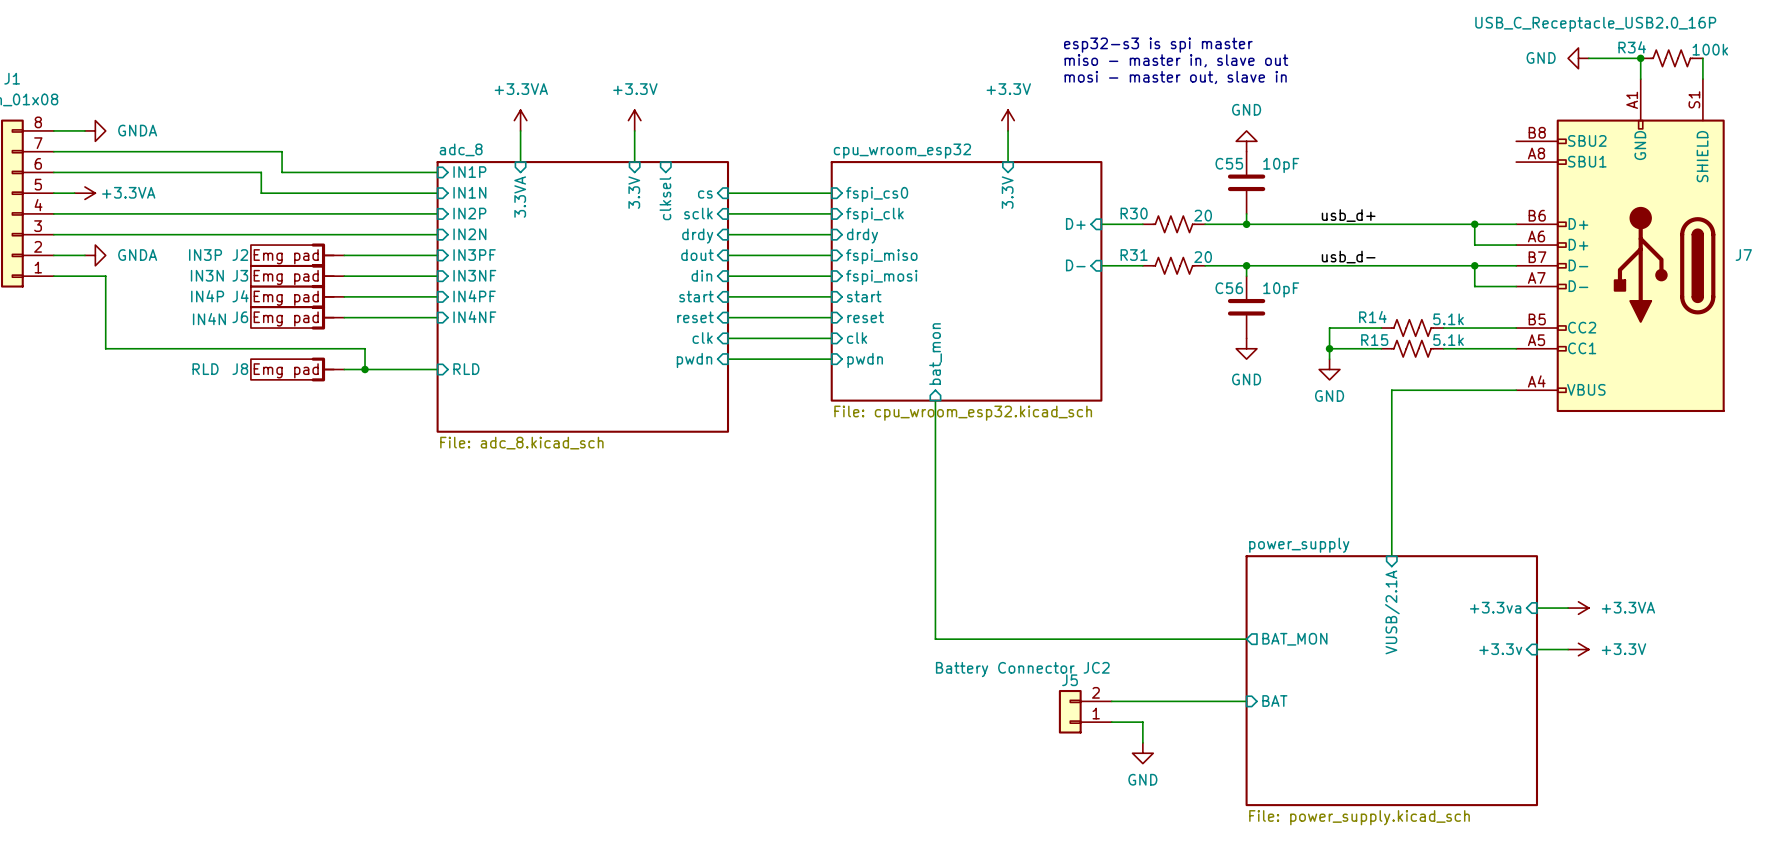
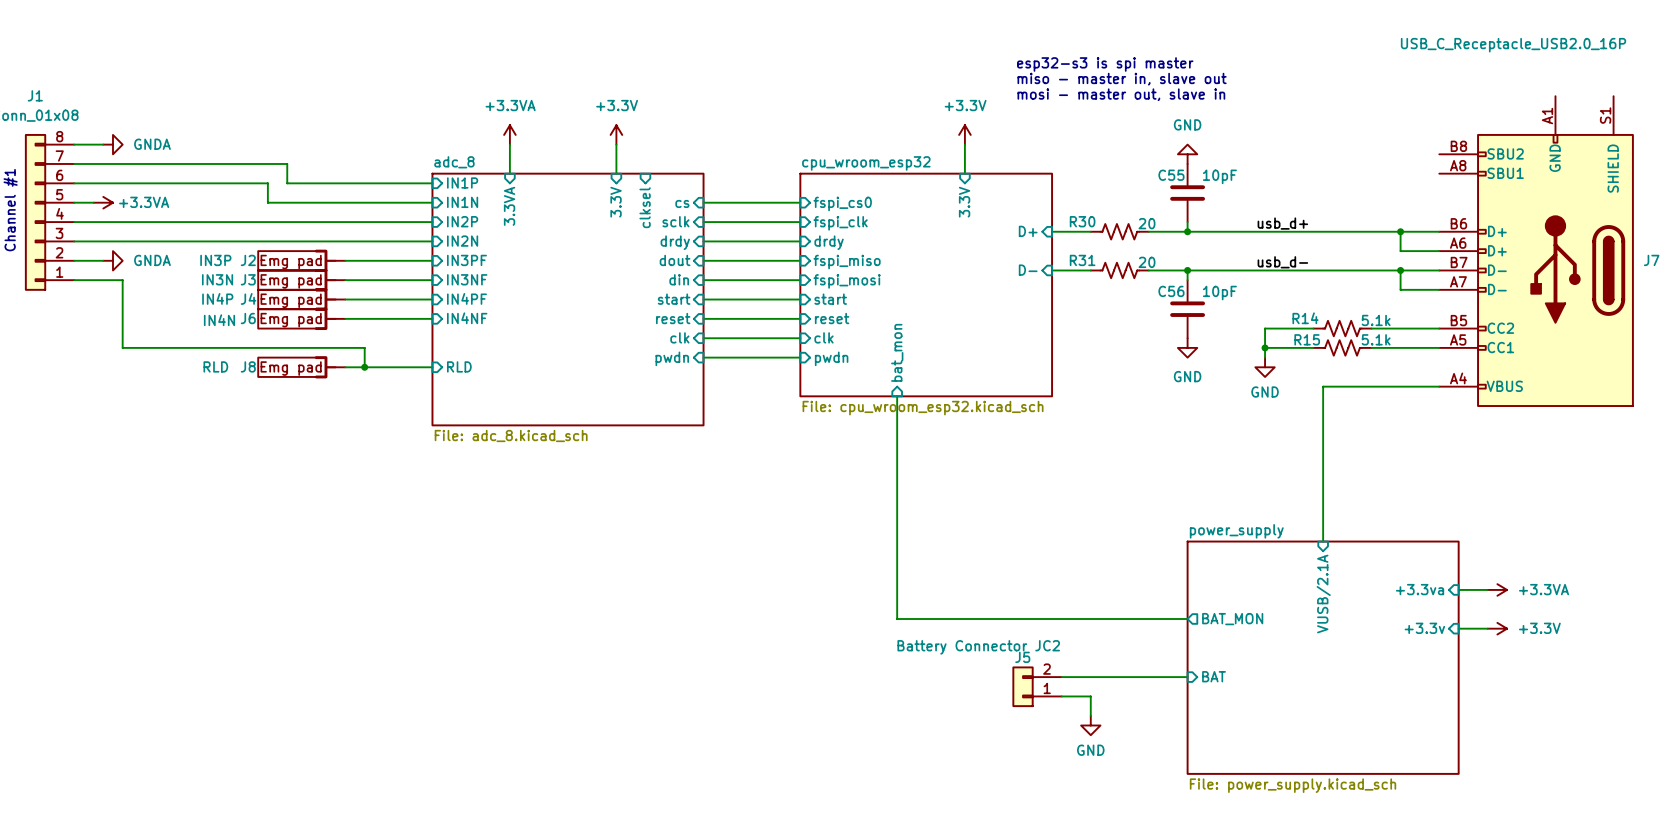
power symbol: GND (1578, 58) -> none
wire: (1588, 58) (1640, 58) (1640, 79) -> none
junction: (1640, 58) -> none
R34: 100k (1671, 58) -> none
wire: (1702, 58) (1702, 79) -> none

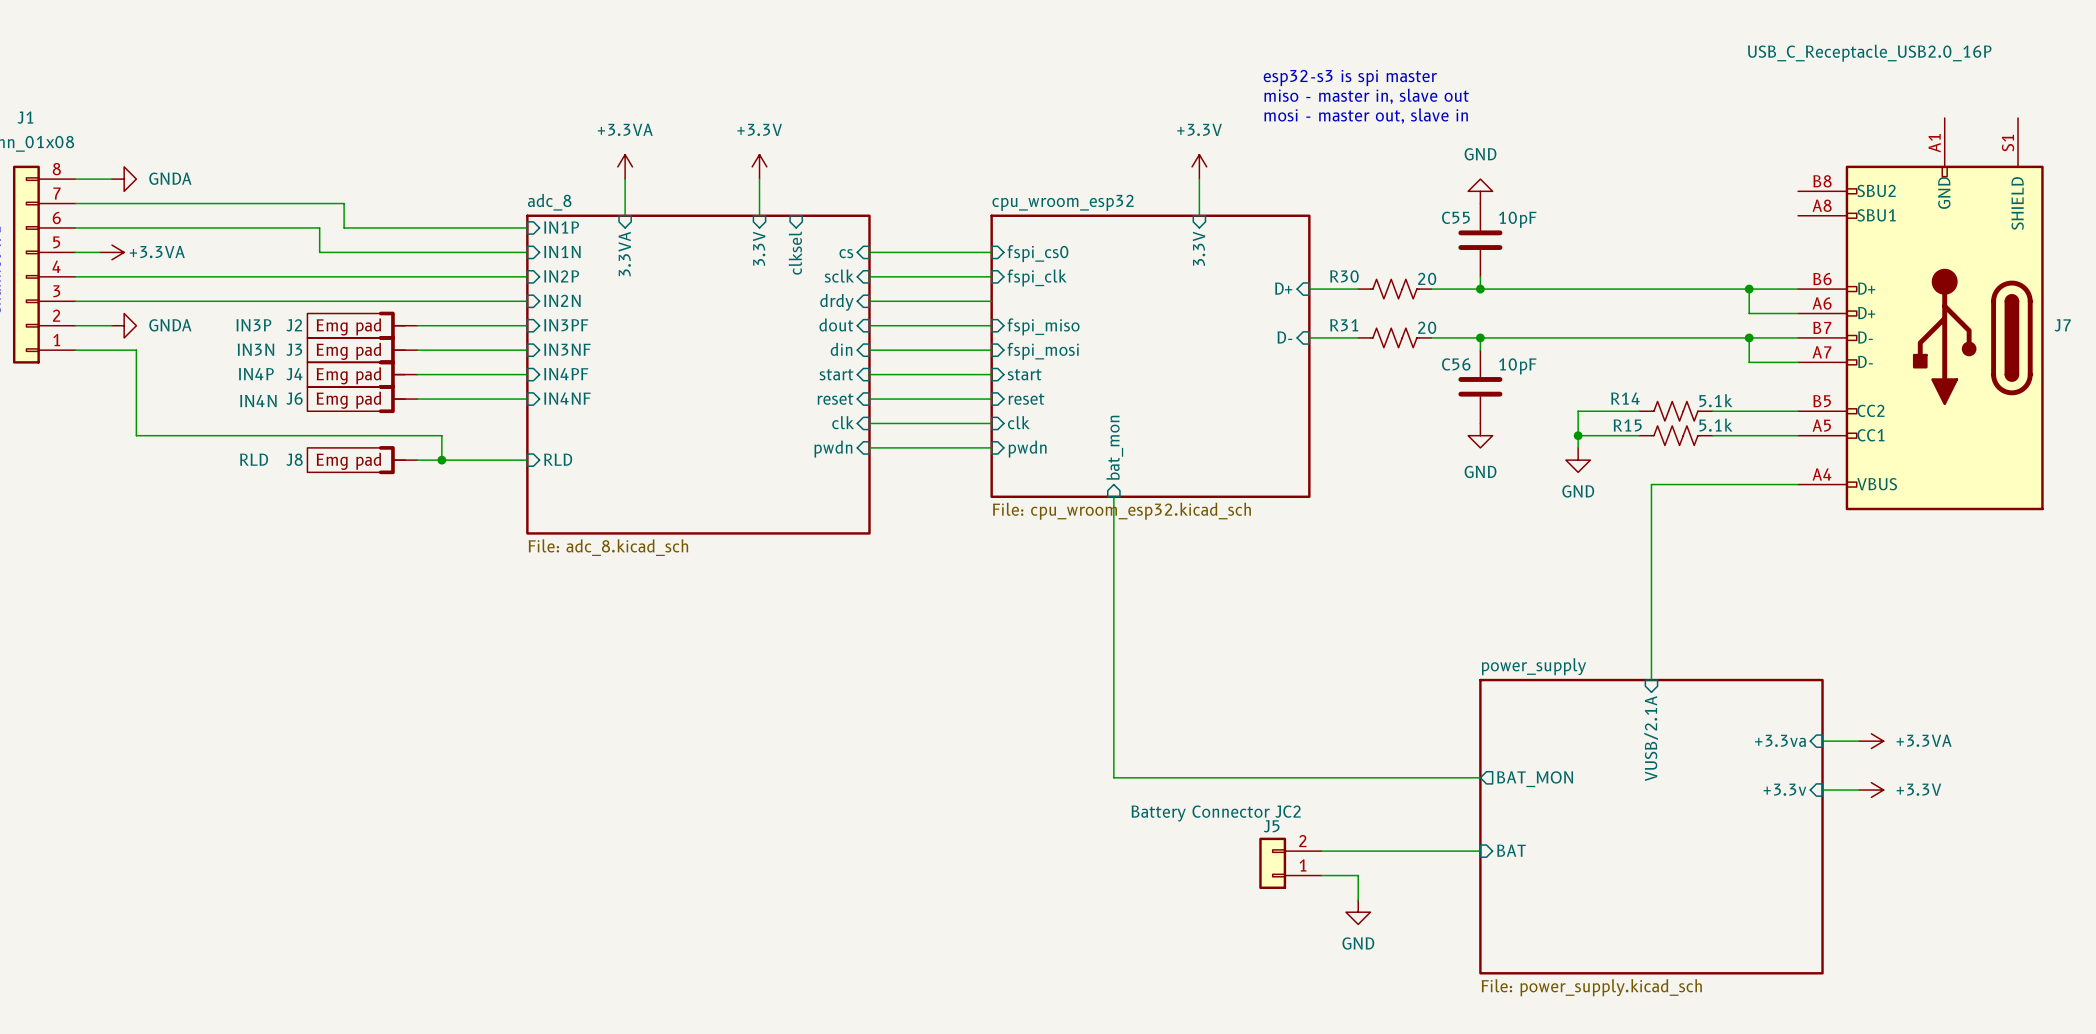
label: usb_d+ (1282, 223) -> none
sheet pin: drdy (829, 242) -> none
label: usb_d- (1282, 262) -> none

